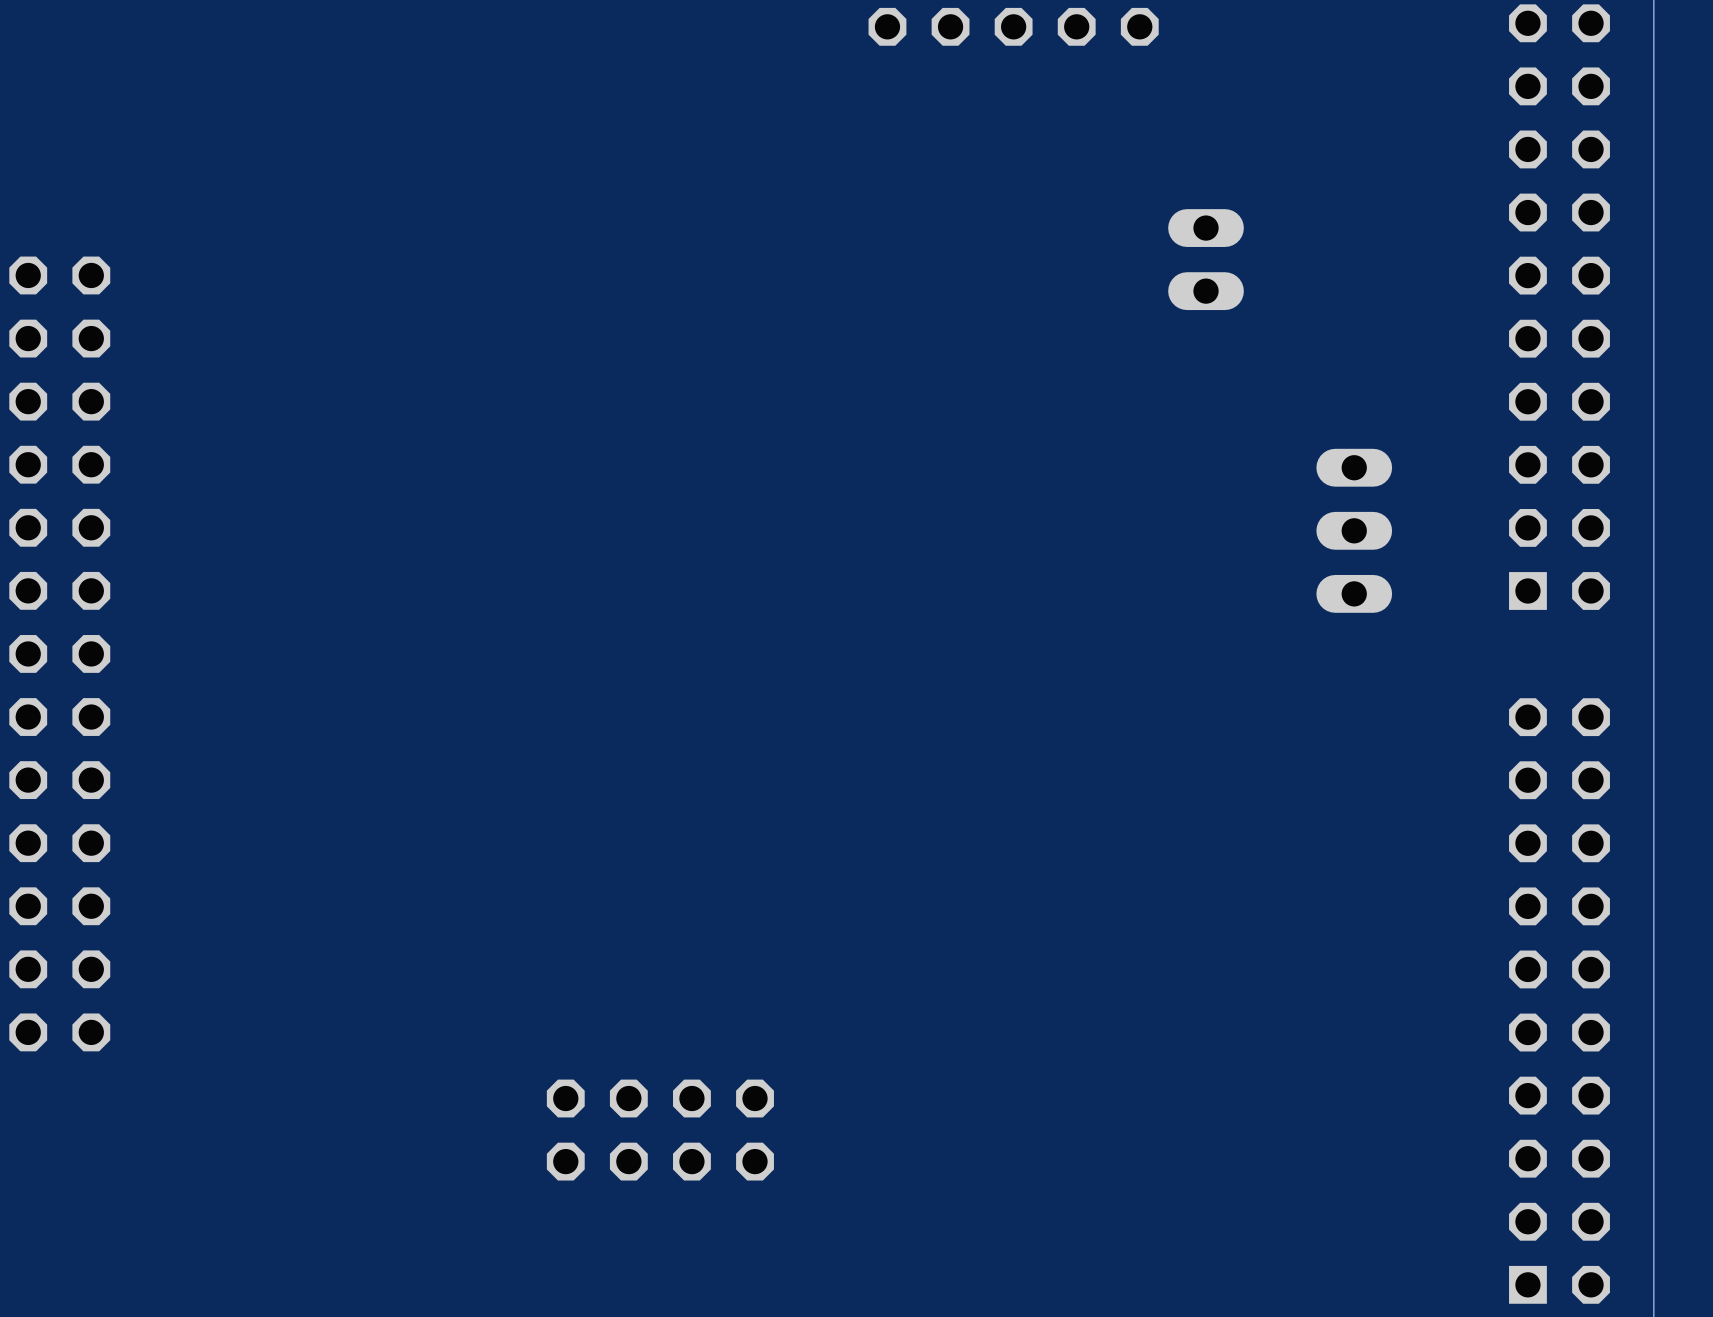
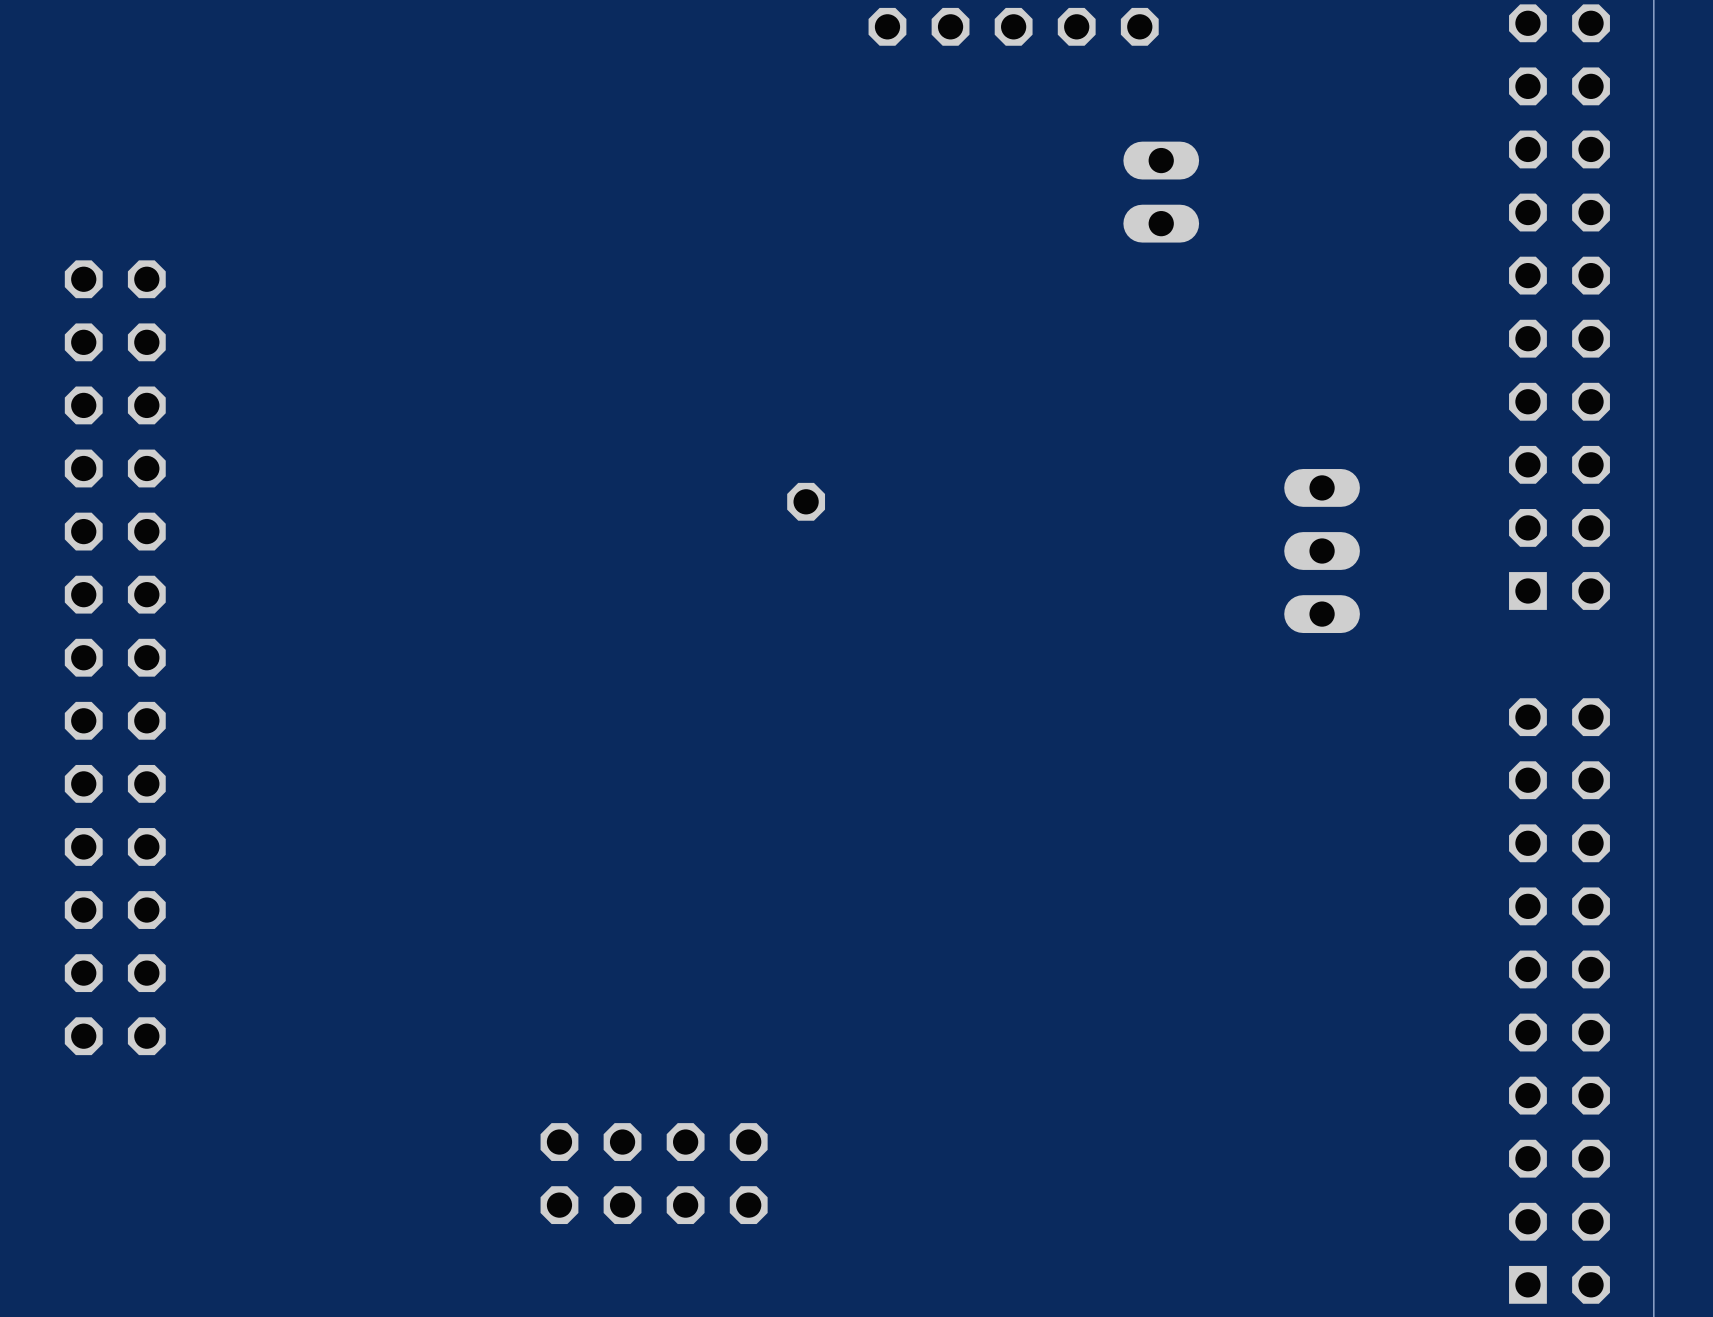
part position: (1206, 259) -> (1161, 192)
part: none -> (806, 501)
part position: (1354, 530) -> (1322, 551)
part position: (59, 653) -> (115, 657)
part position: (660, 1130) -> (654, 1173)

